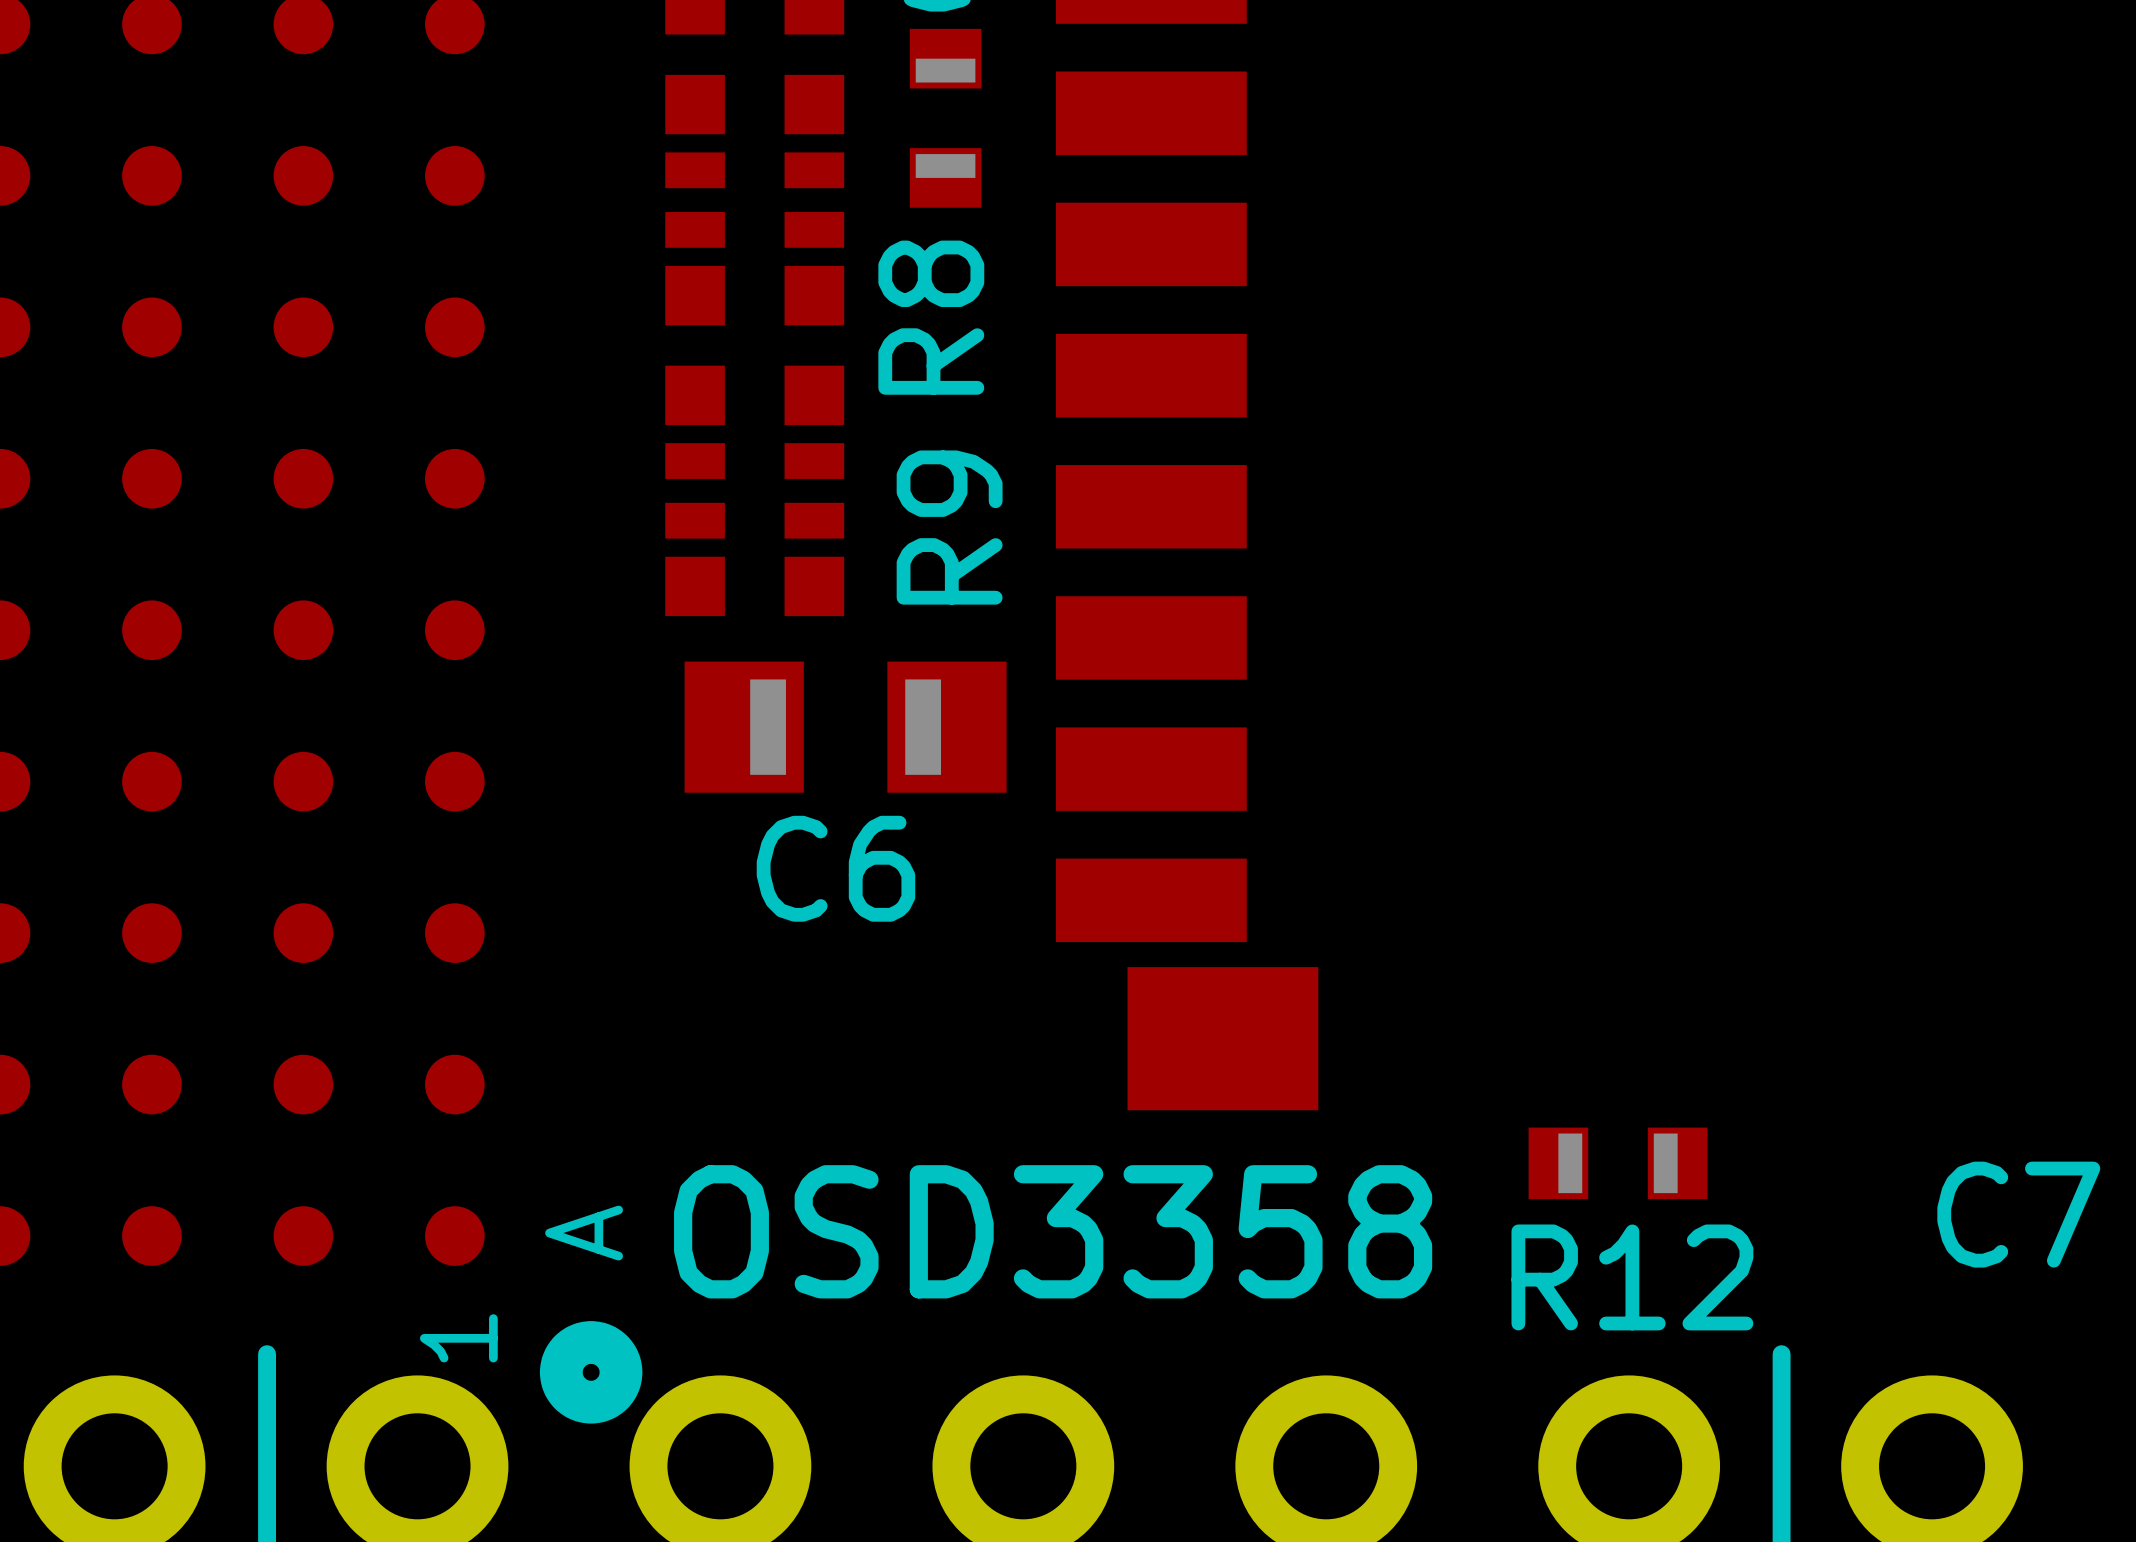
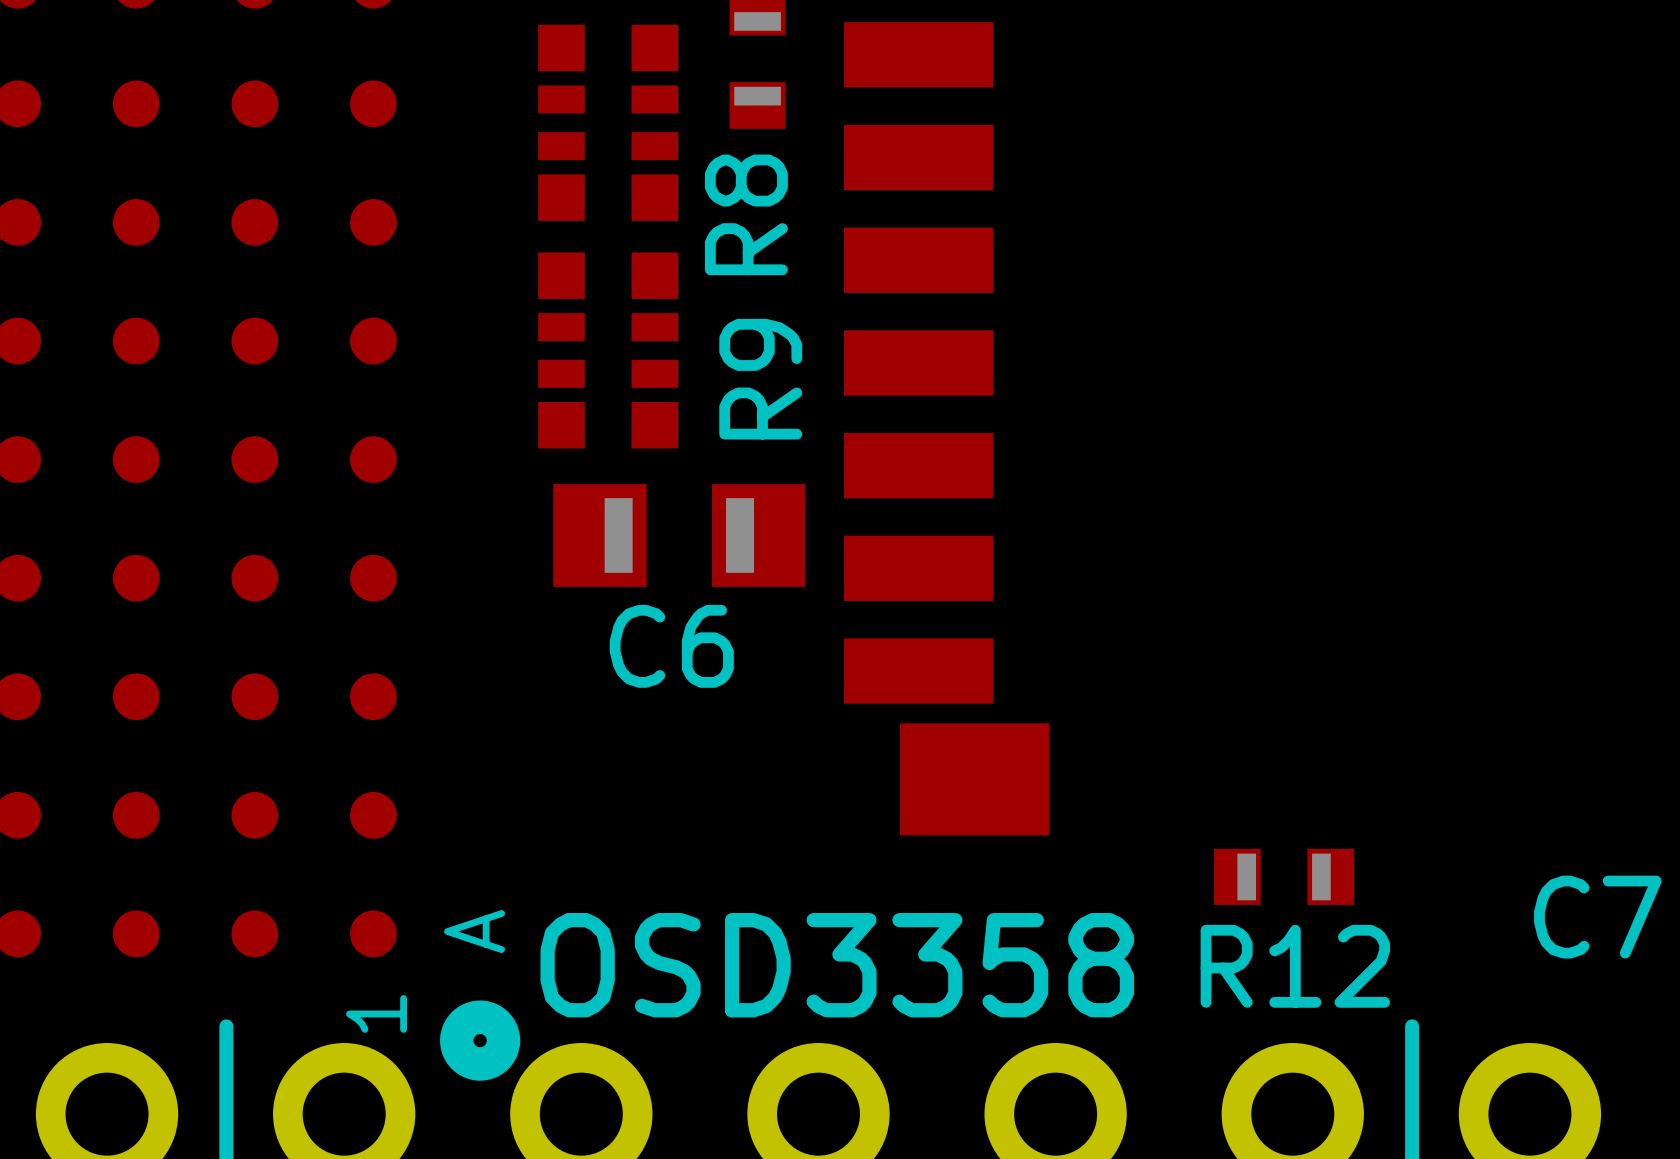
text position: OSD3358 (1053, 1231) -> OSD3358 (837, 965)

